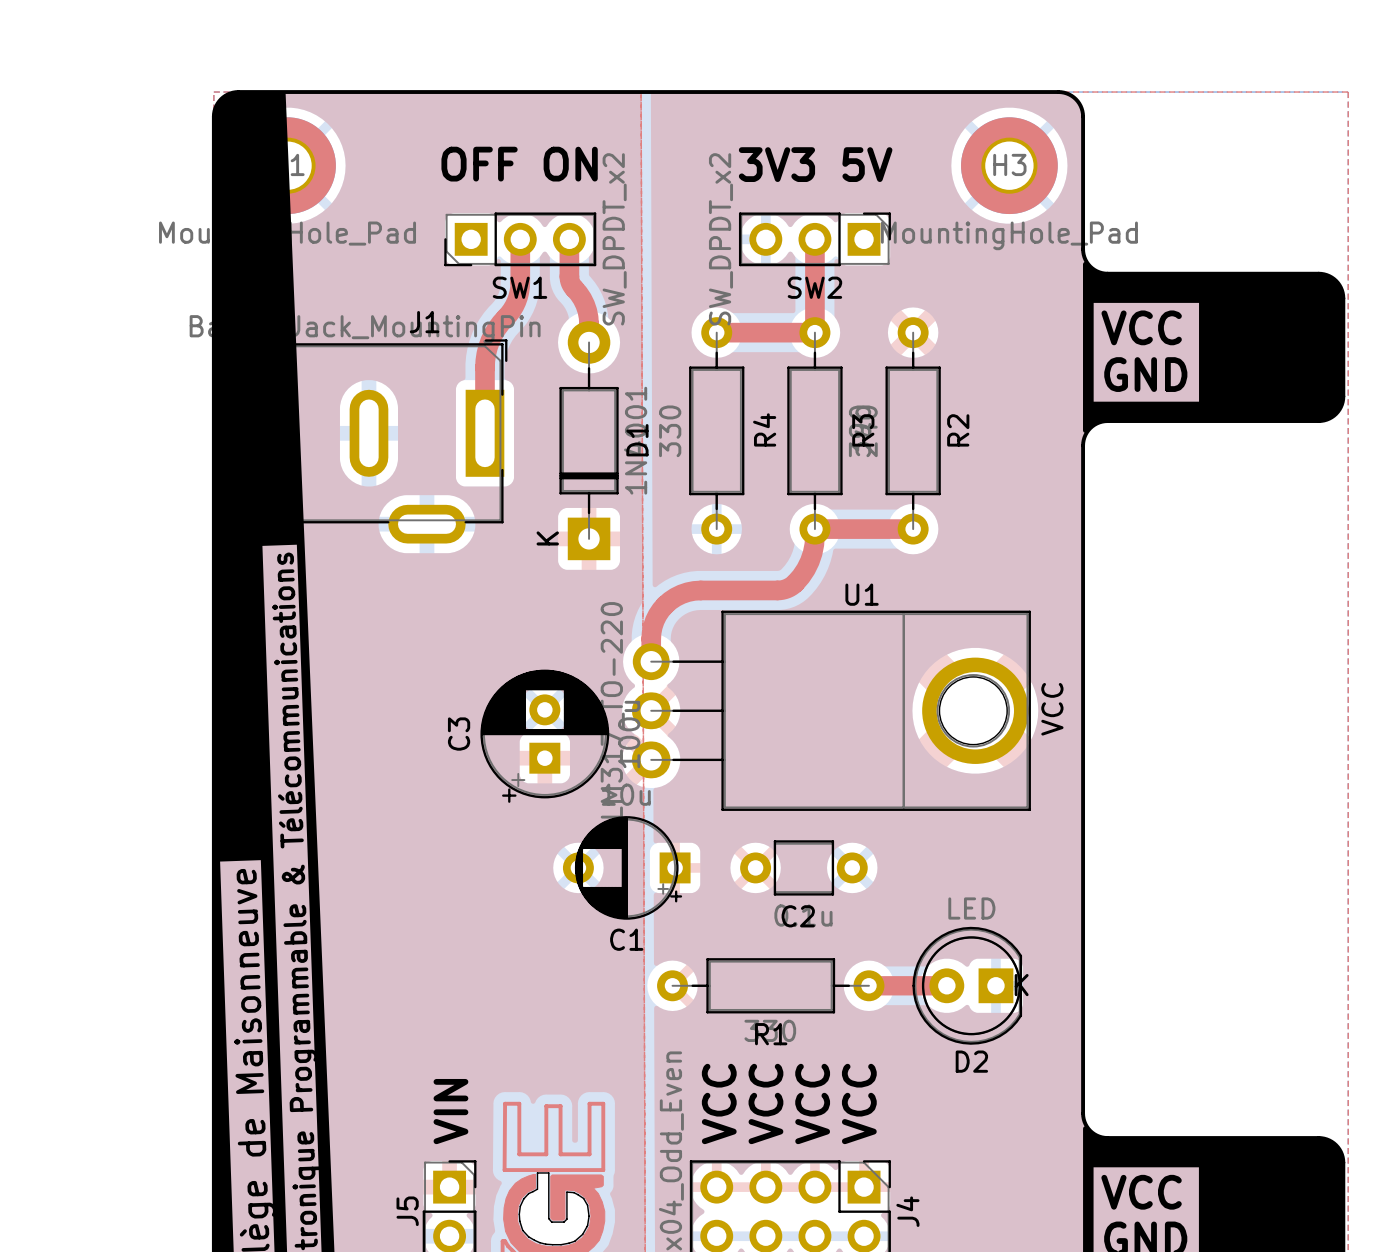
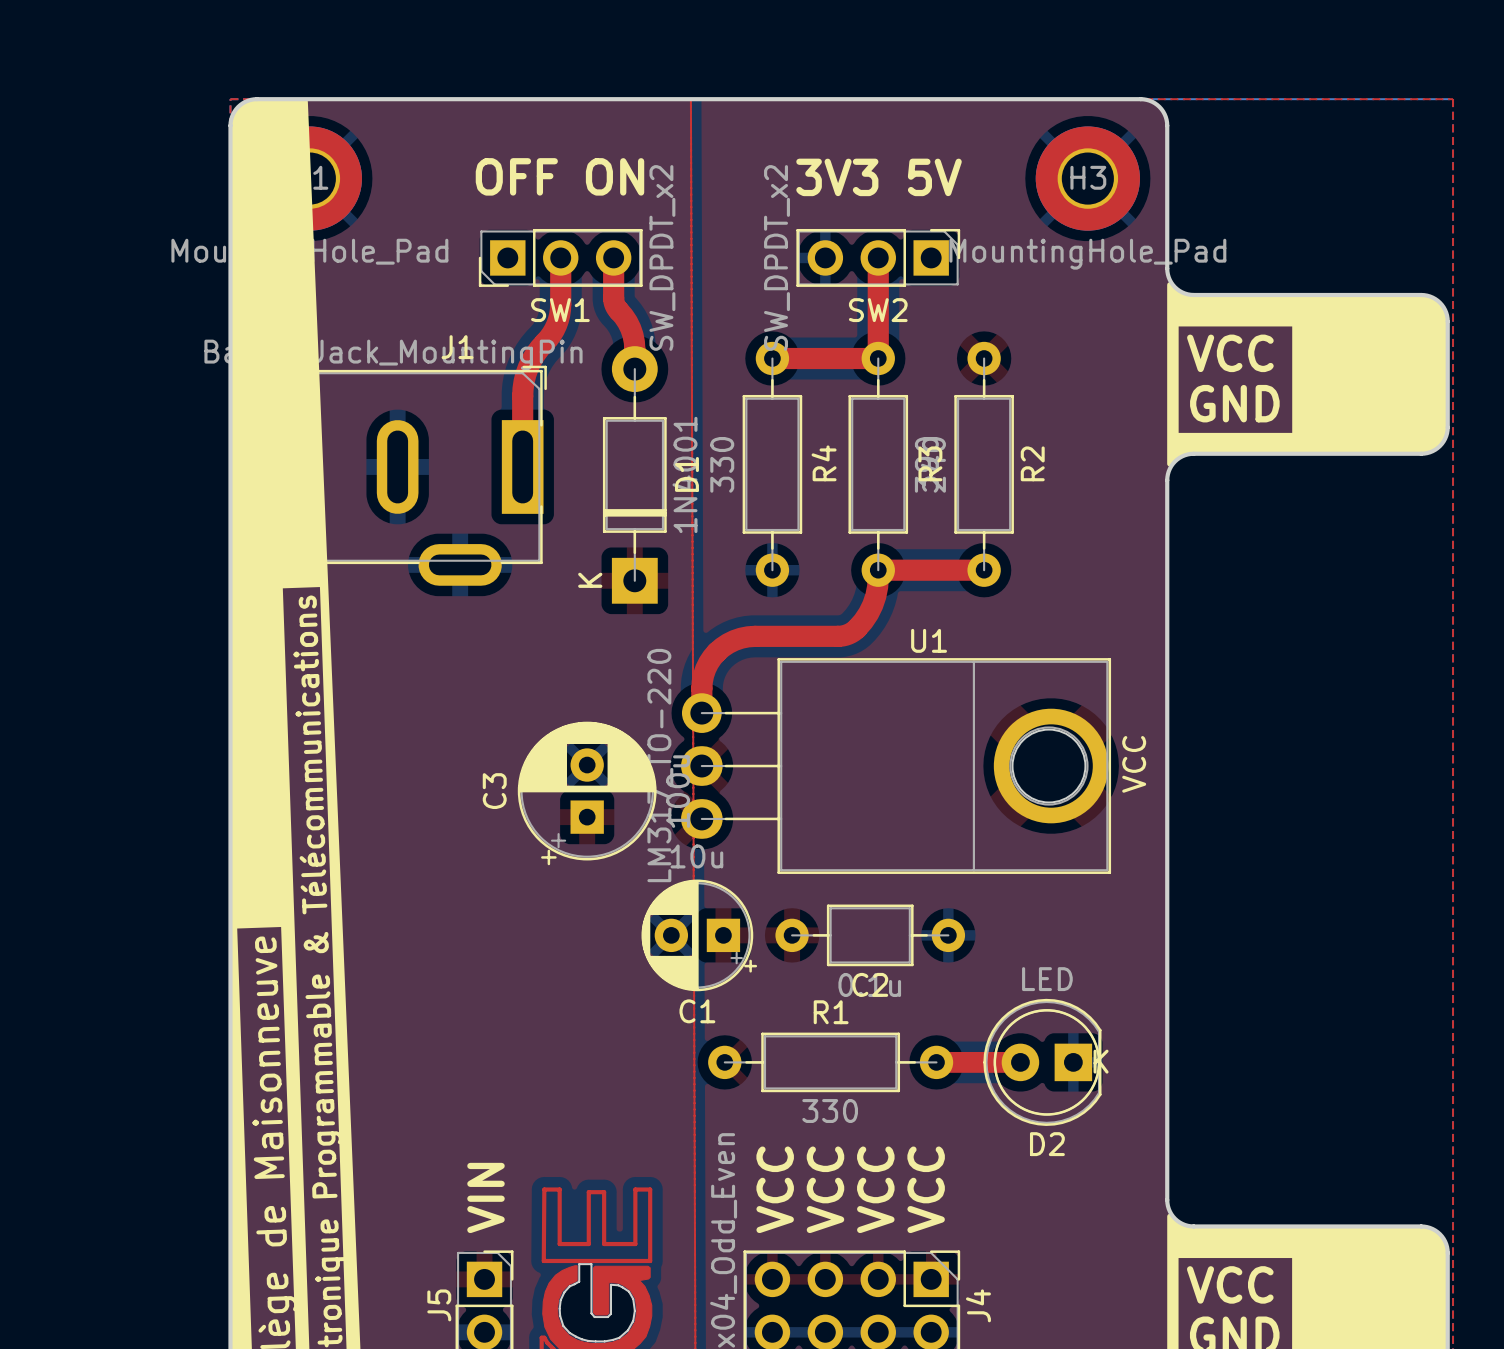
C1 footprint: [562, 816, 691, 920] -> [641, 879, 758, 992]
C2 footprint: [740, 840, 868, 896] -> [775, 904, 966, 967]
R1 name position: R1 (771, 1034) -> R1 (831, 1012)

